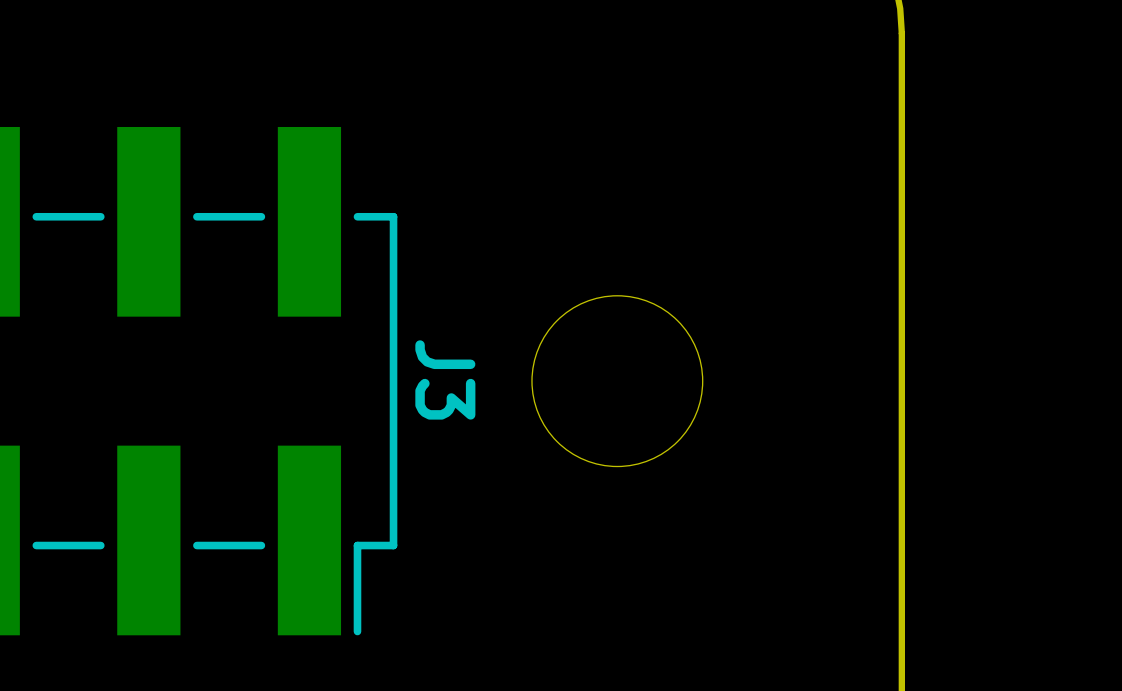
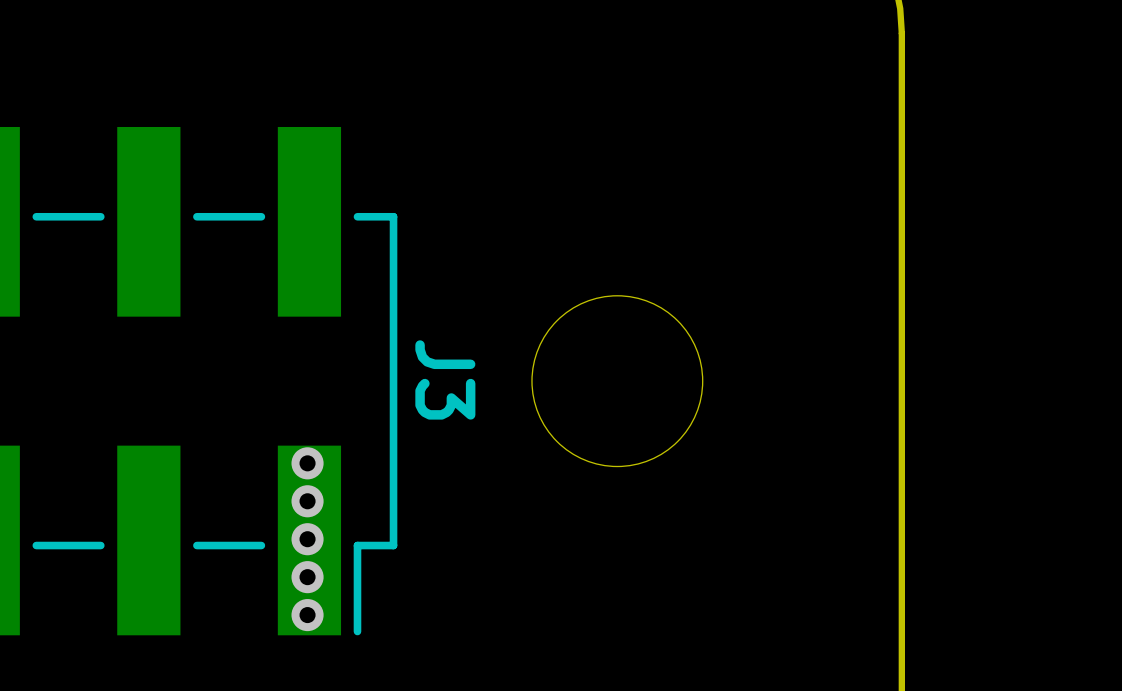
via: none -> (307, 463)
via: none -> (307, 501)
via: none -> (307, 539)
via: none -> (307, 577)
via: none -> (307, 615)

